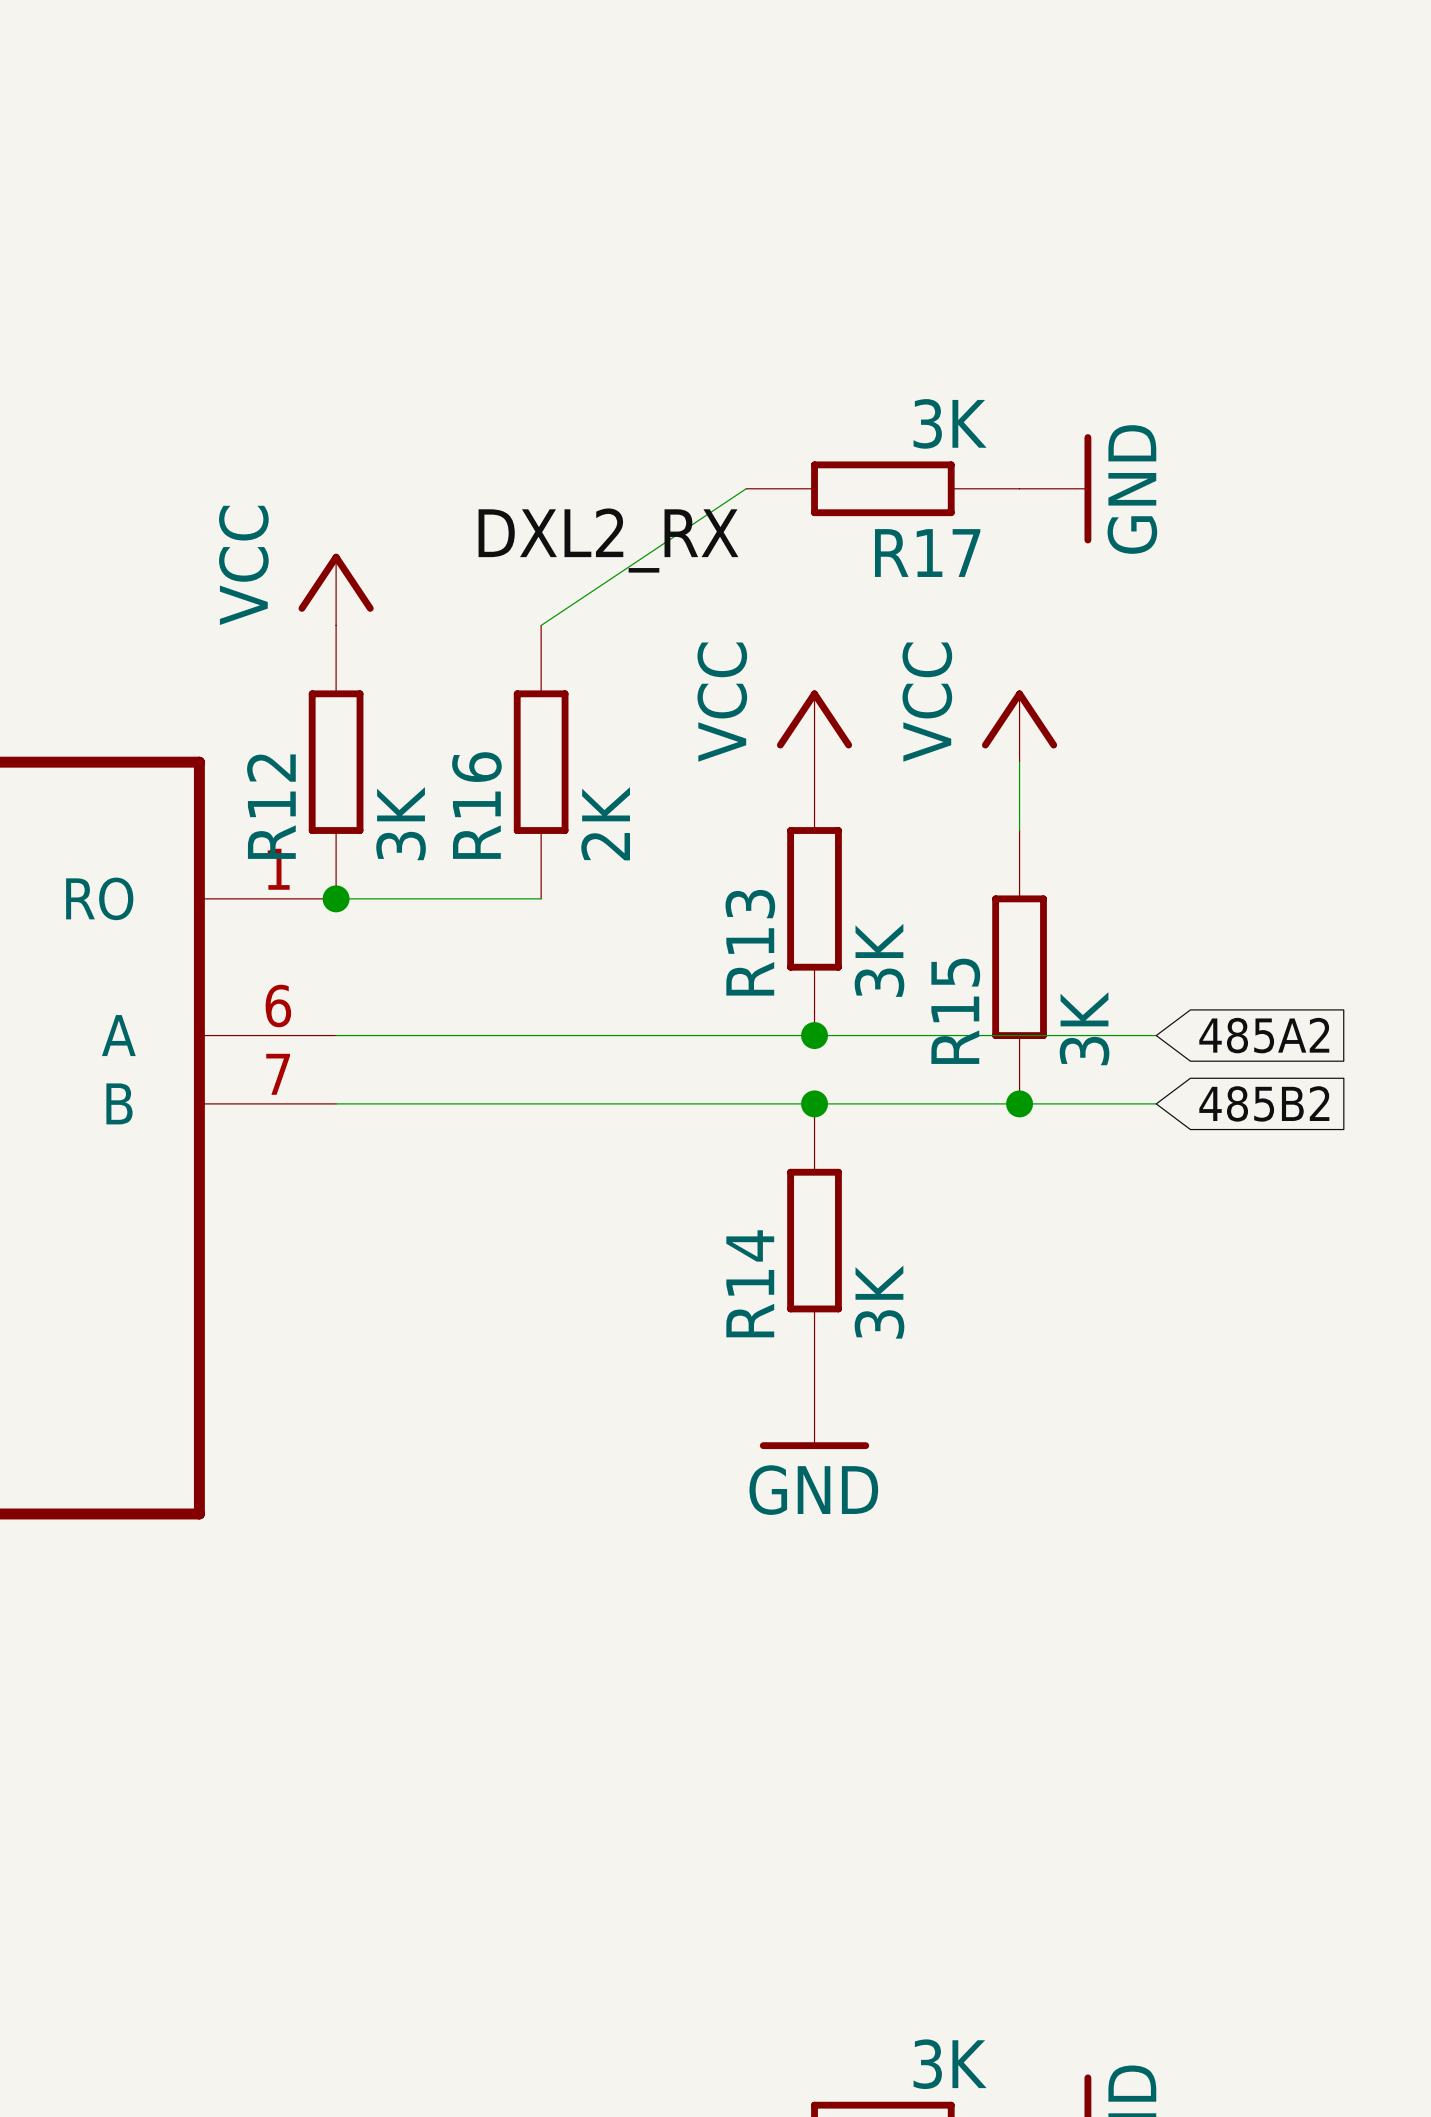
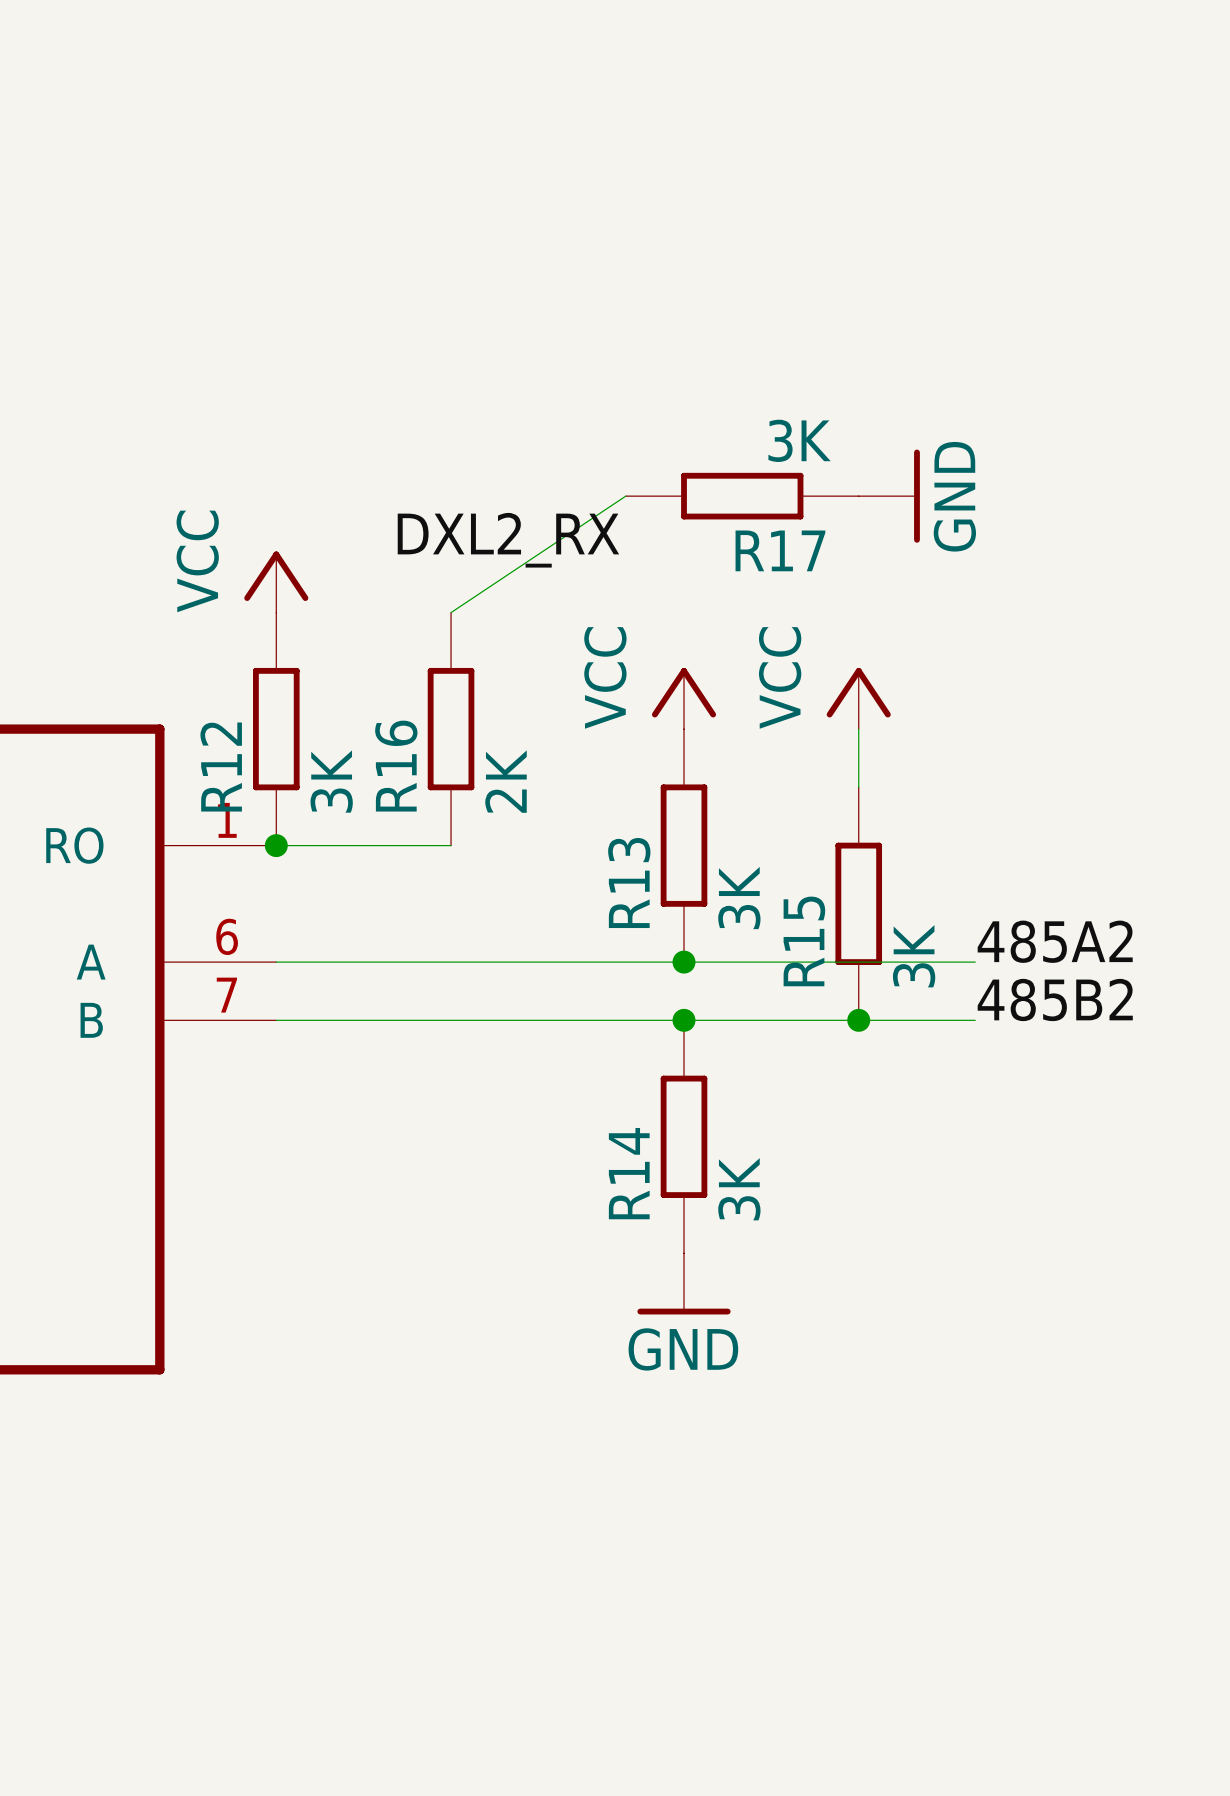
label: none -> 485A2 (1055, 941)
global label: 485A2 (1264, 1035) -> none
label: none -> 485B2 (1055, 999)
global label: 485B2 (1264, 1103) -> none

